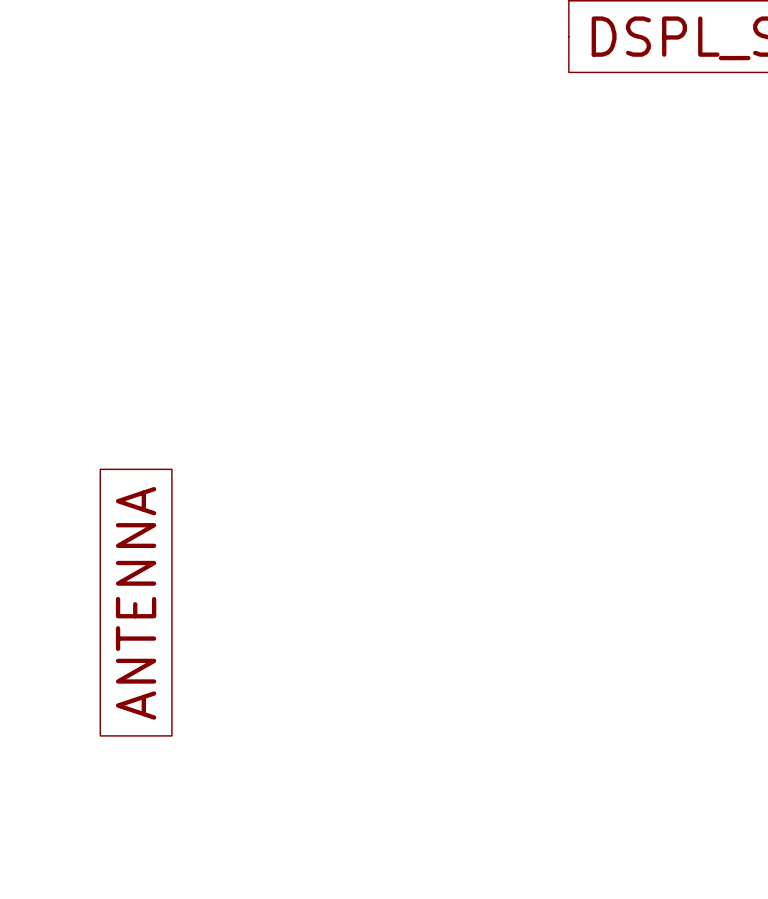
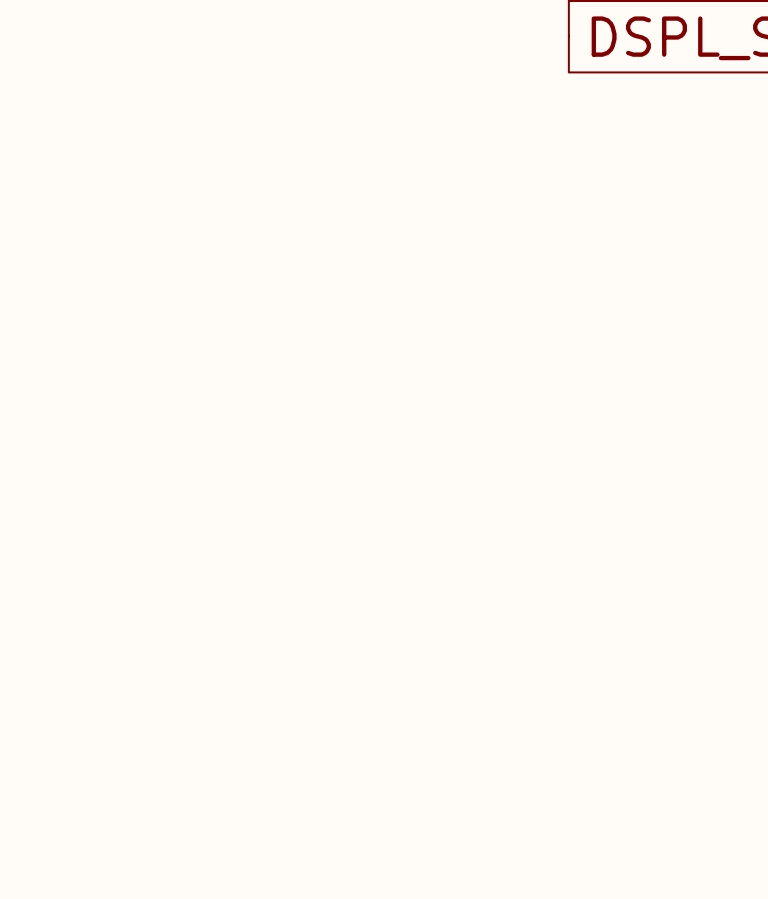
global label: ANTENNA (136, 603) -> none

